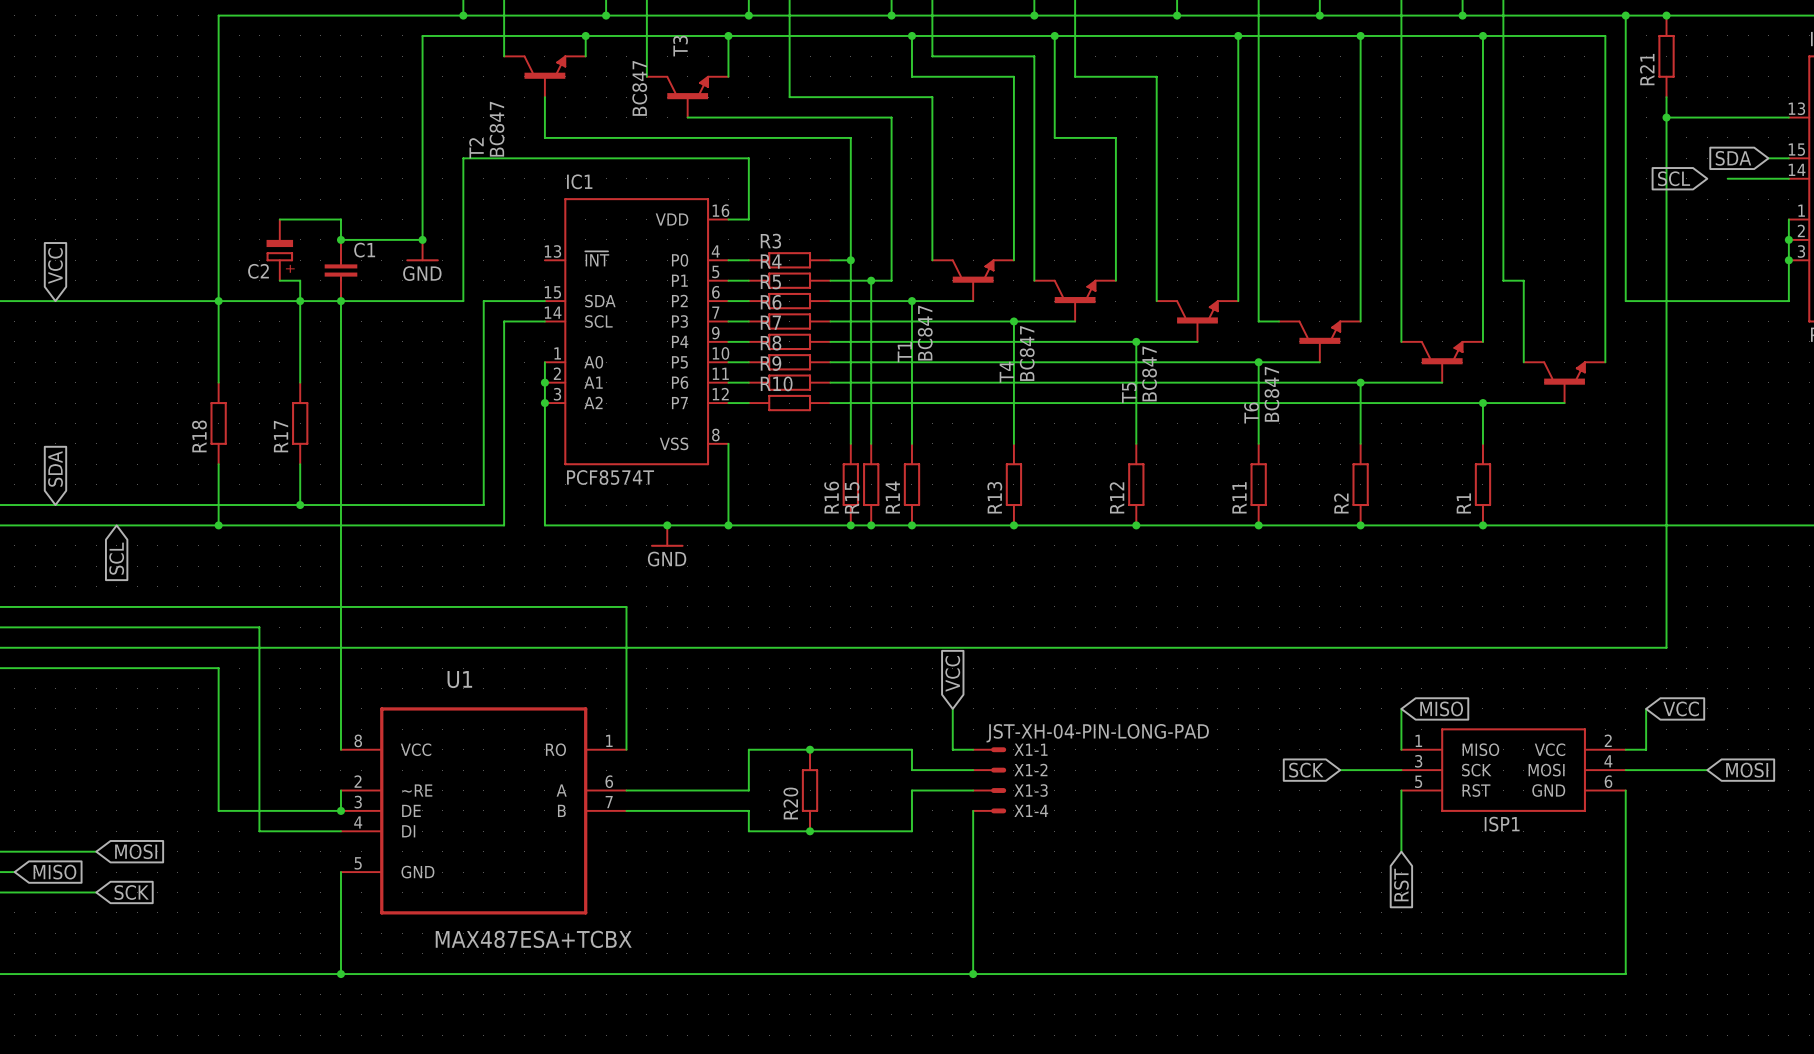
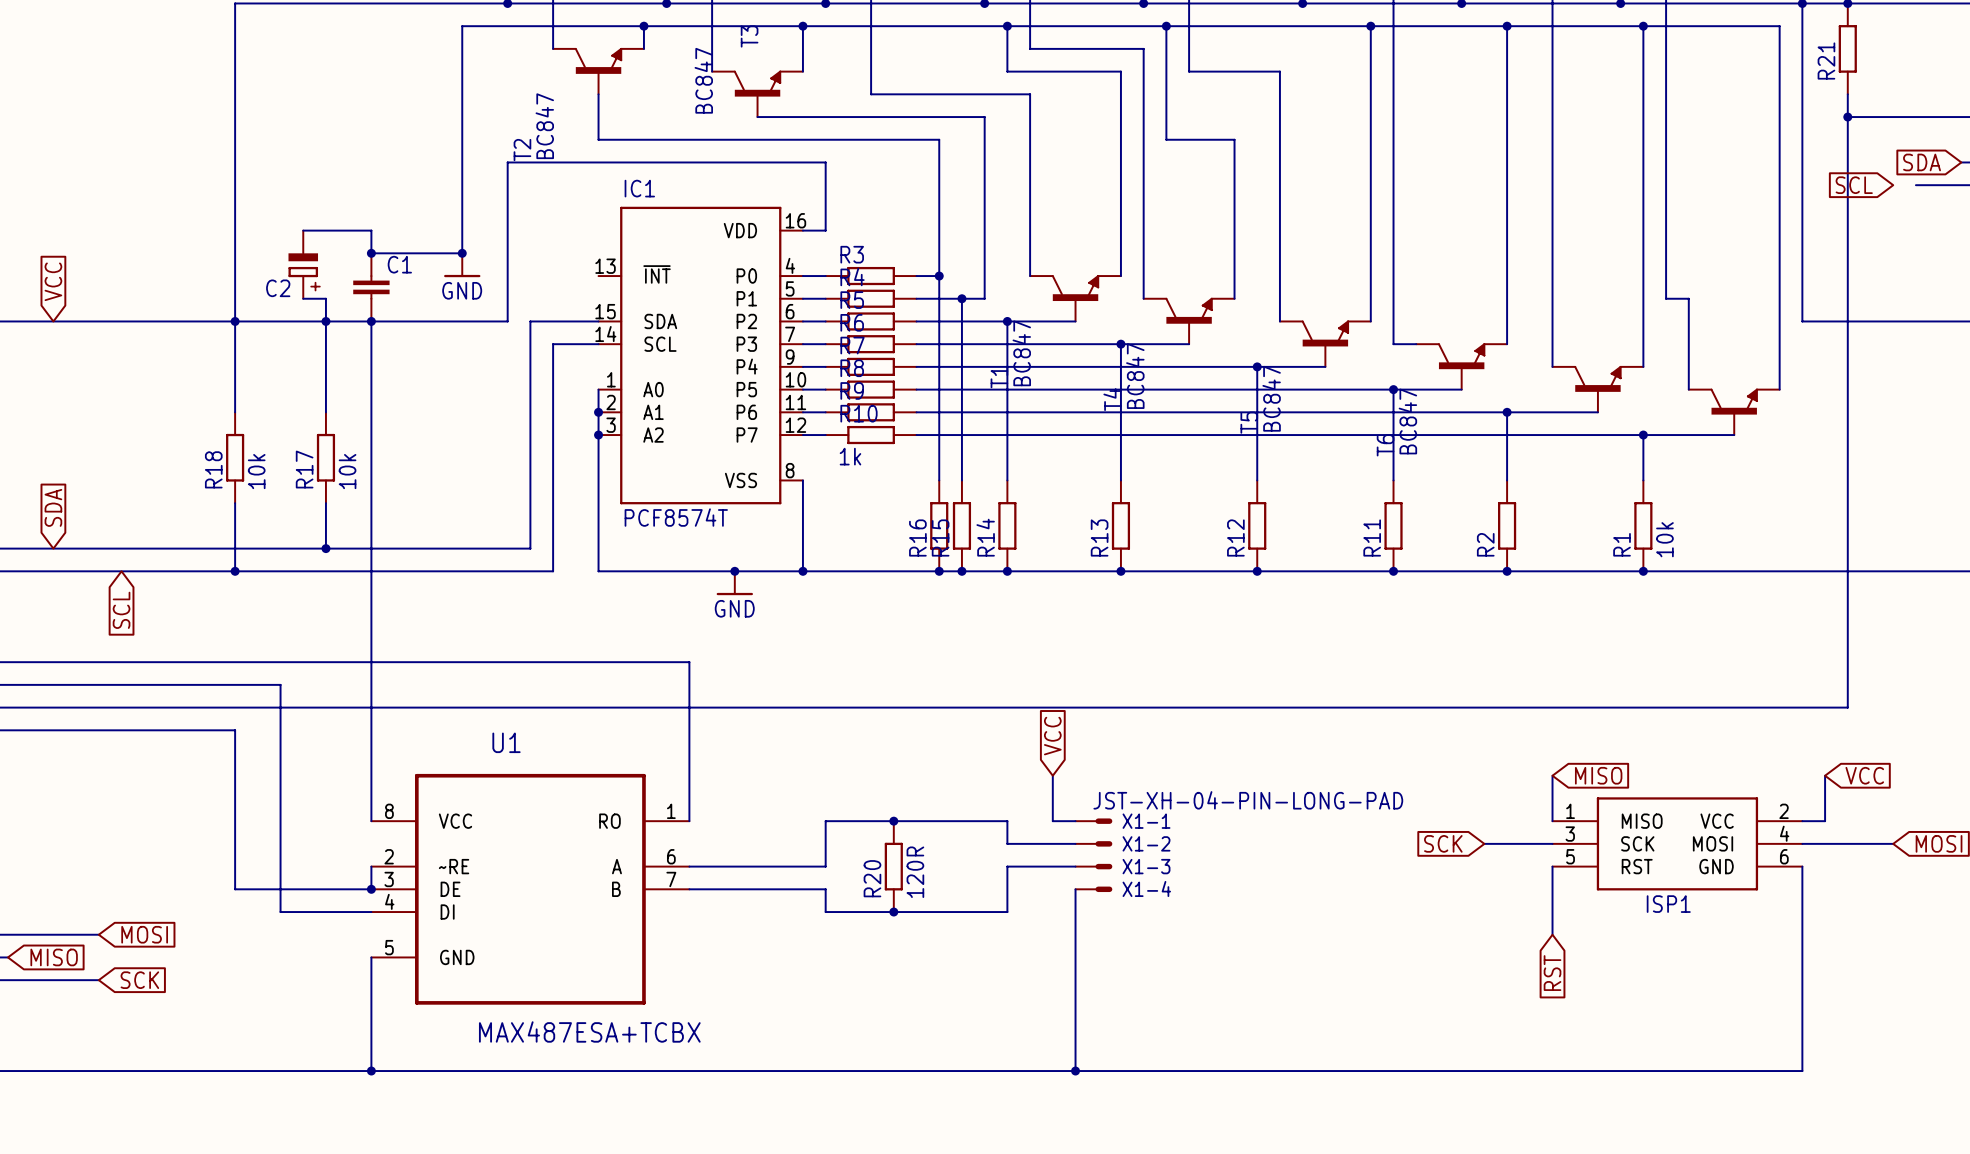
R10 value: none -> 1k (850, 456)
R18 value: none -> 10k (256, 471)
R17 value: none -> 10k (347, 471)
R1 value: none -> 10k (1664, 539)
R20 value: none -> 120R (915, 872)

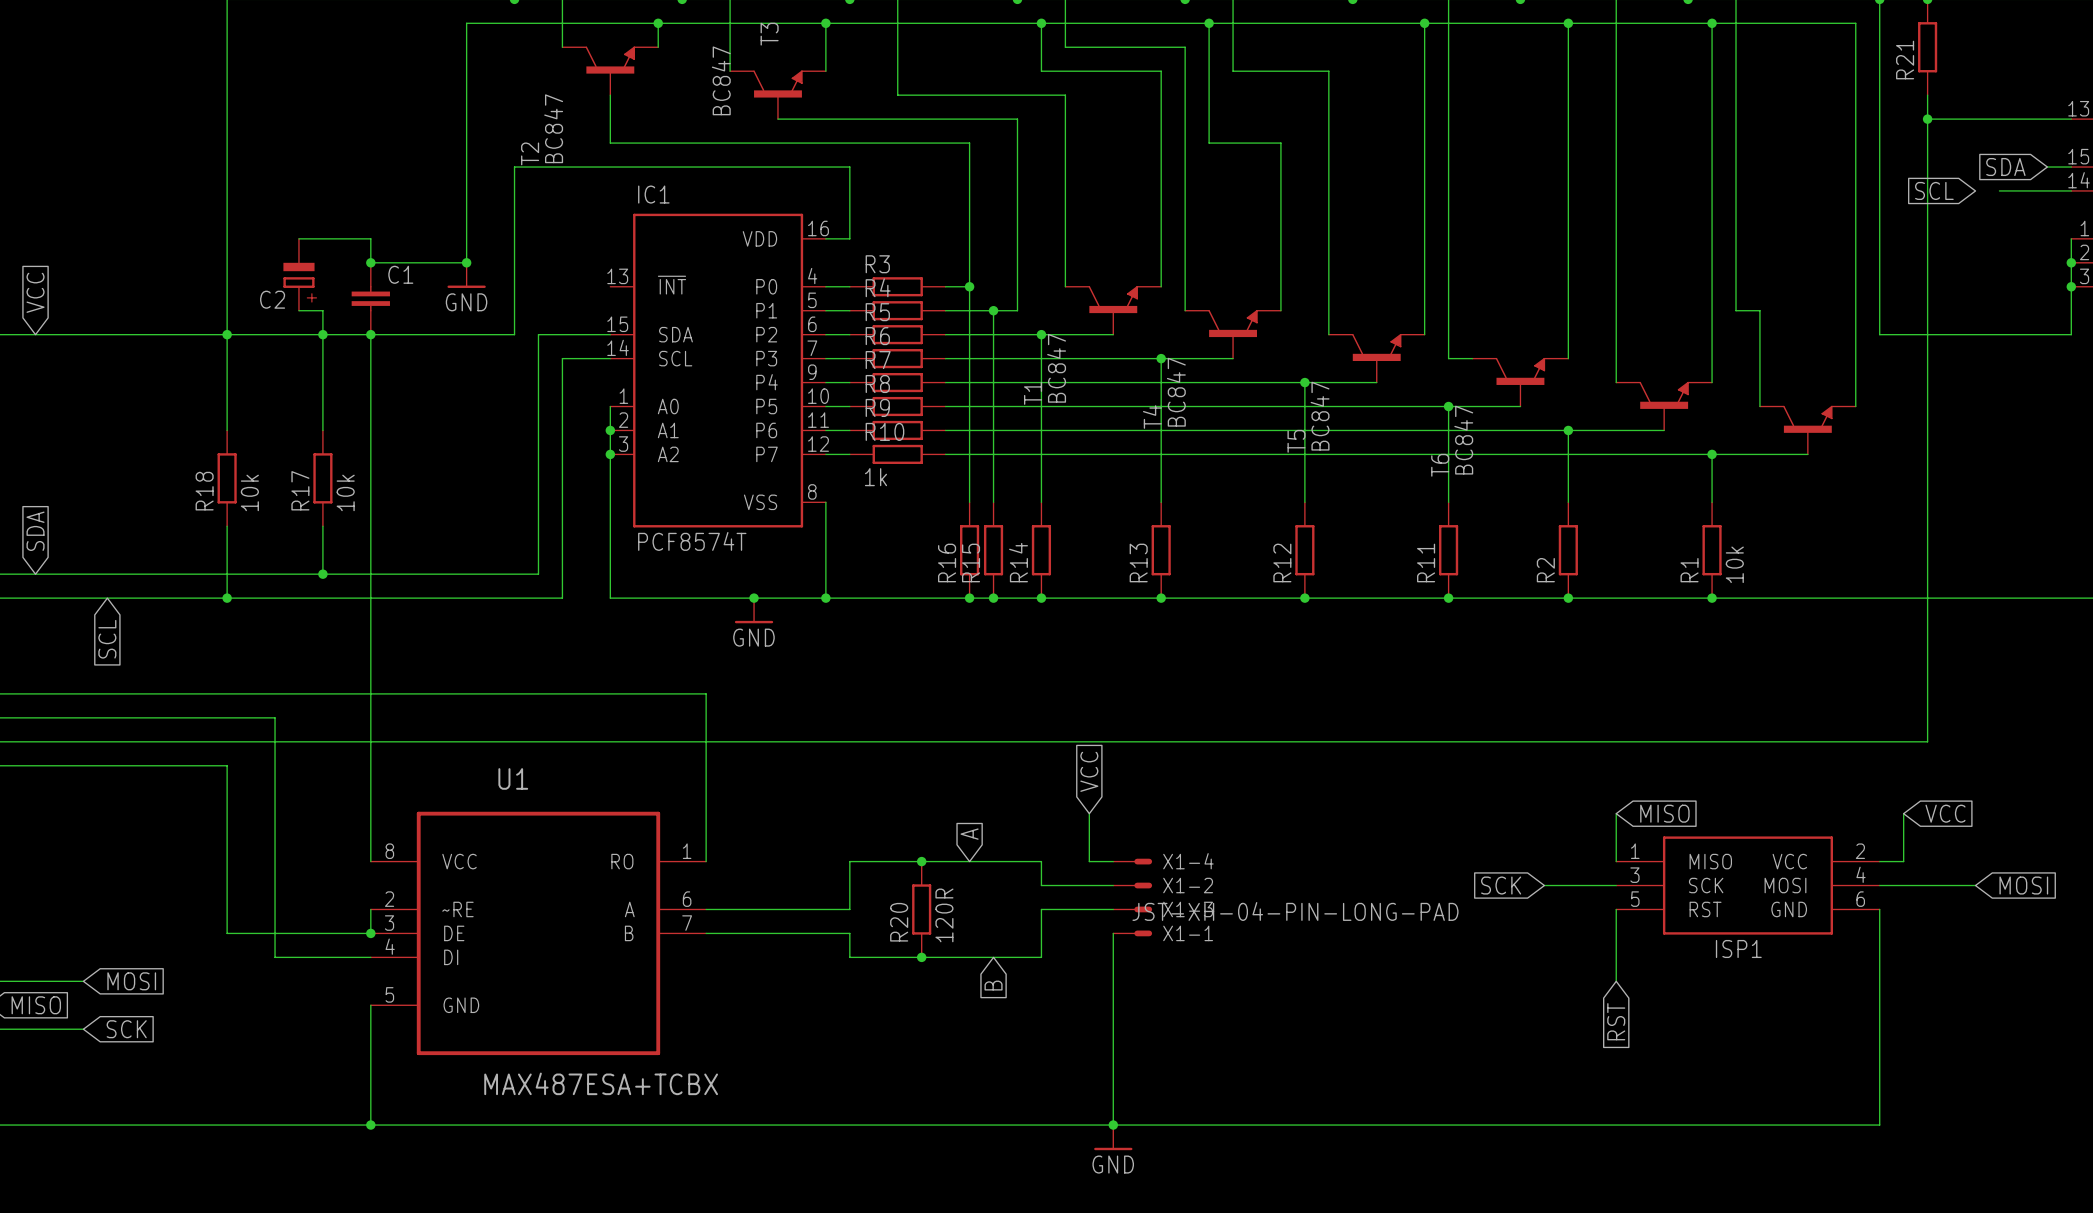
global label: none -> A (969, 834)
X1-1 value: JST-XH-04-PIN-LONG-PAD (1248, 800) -> none
X1-1 name: X1-1 (1146, 821) -> X1-4 (1188, 861)
X1-4 value: none -> JST-XH-04-PIN-LONG-PAD (1295, 911)
X1-4 name: X1-4 (1146, 888) -> X1-1 (1188, 933)
global label: none -> B (993, 985)
power symbol: none -> GND (1113, 1137)

